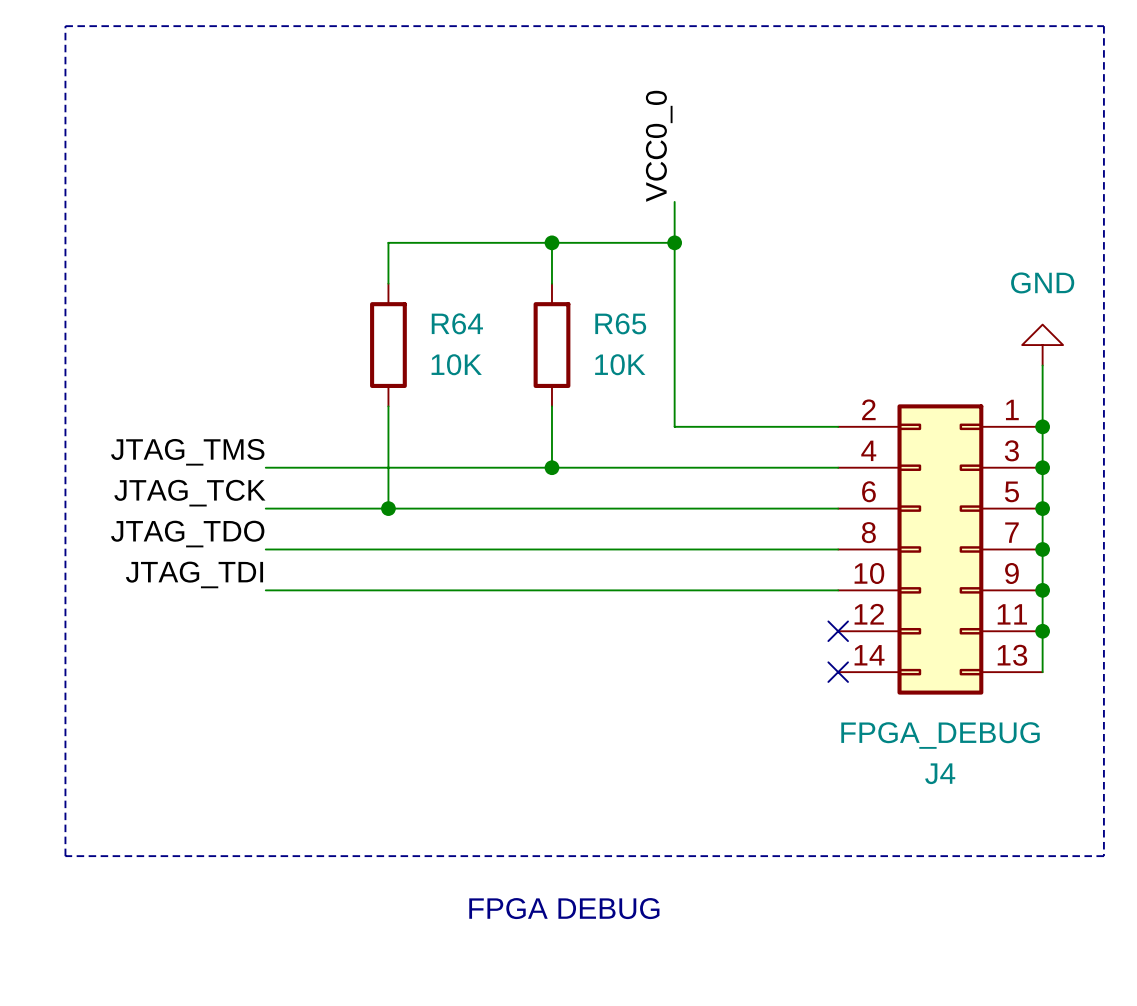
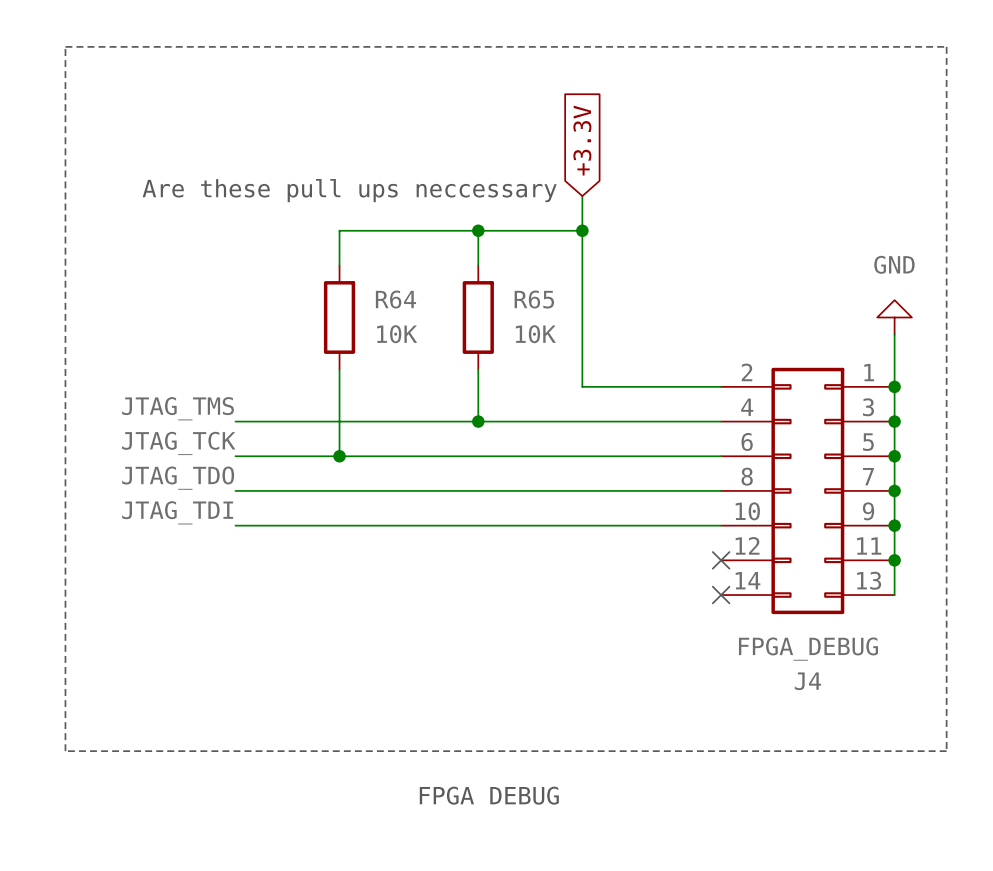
global label: none -> +3.3V (582, 140)
label: VCC0_0 (659, 146) -> none
text: none -> Are these pull ups neccessary (349, 190)

